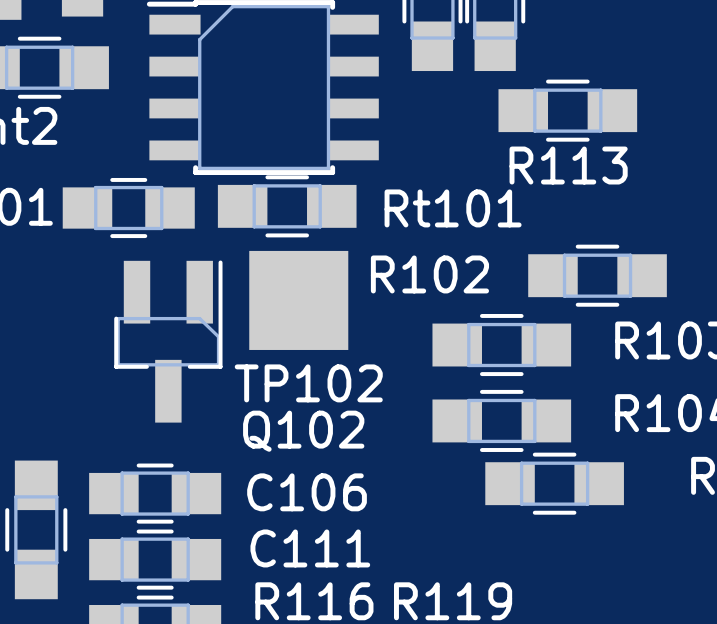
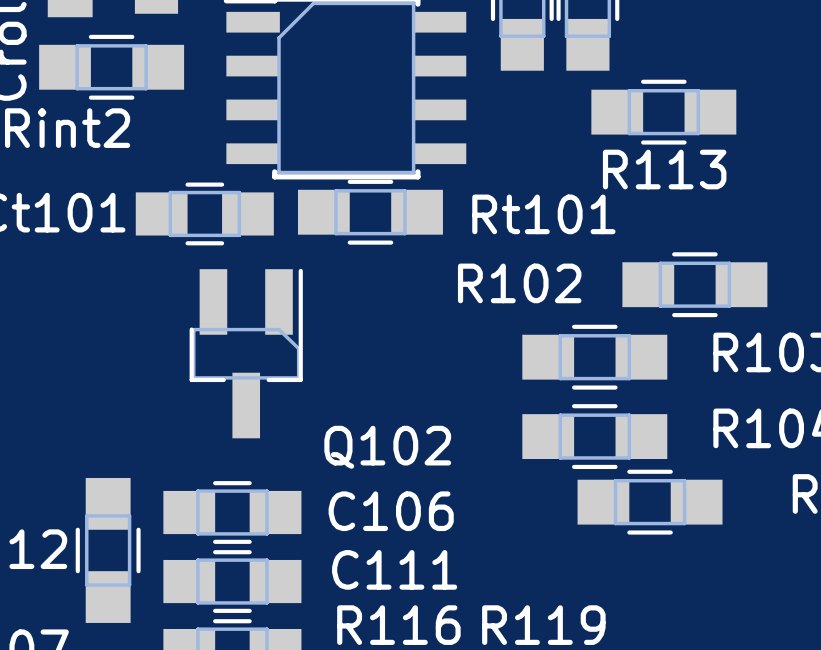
TP102: (298, 300) -> none

